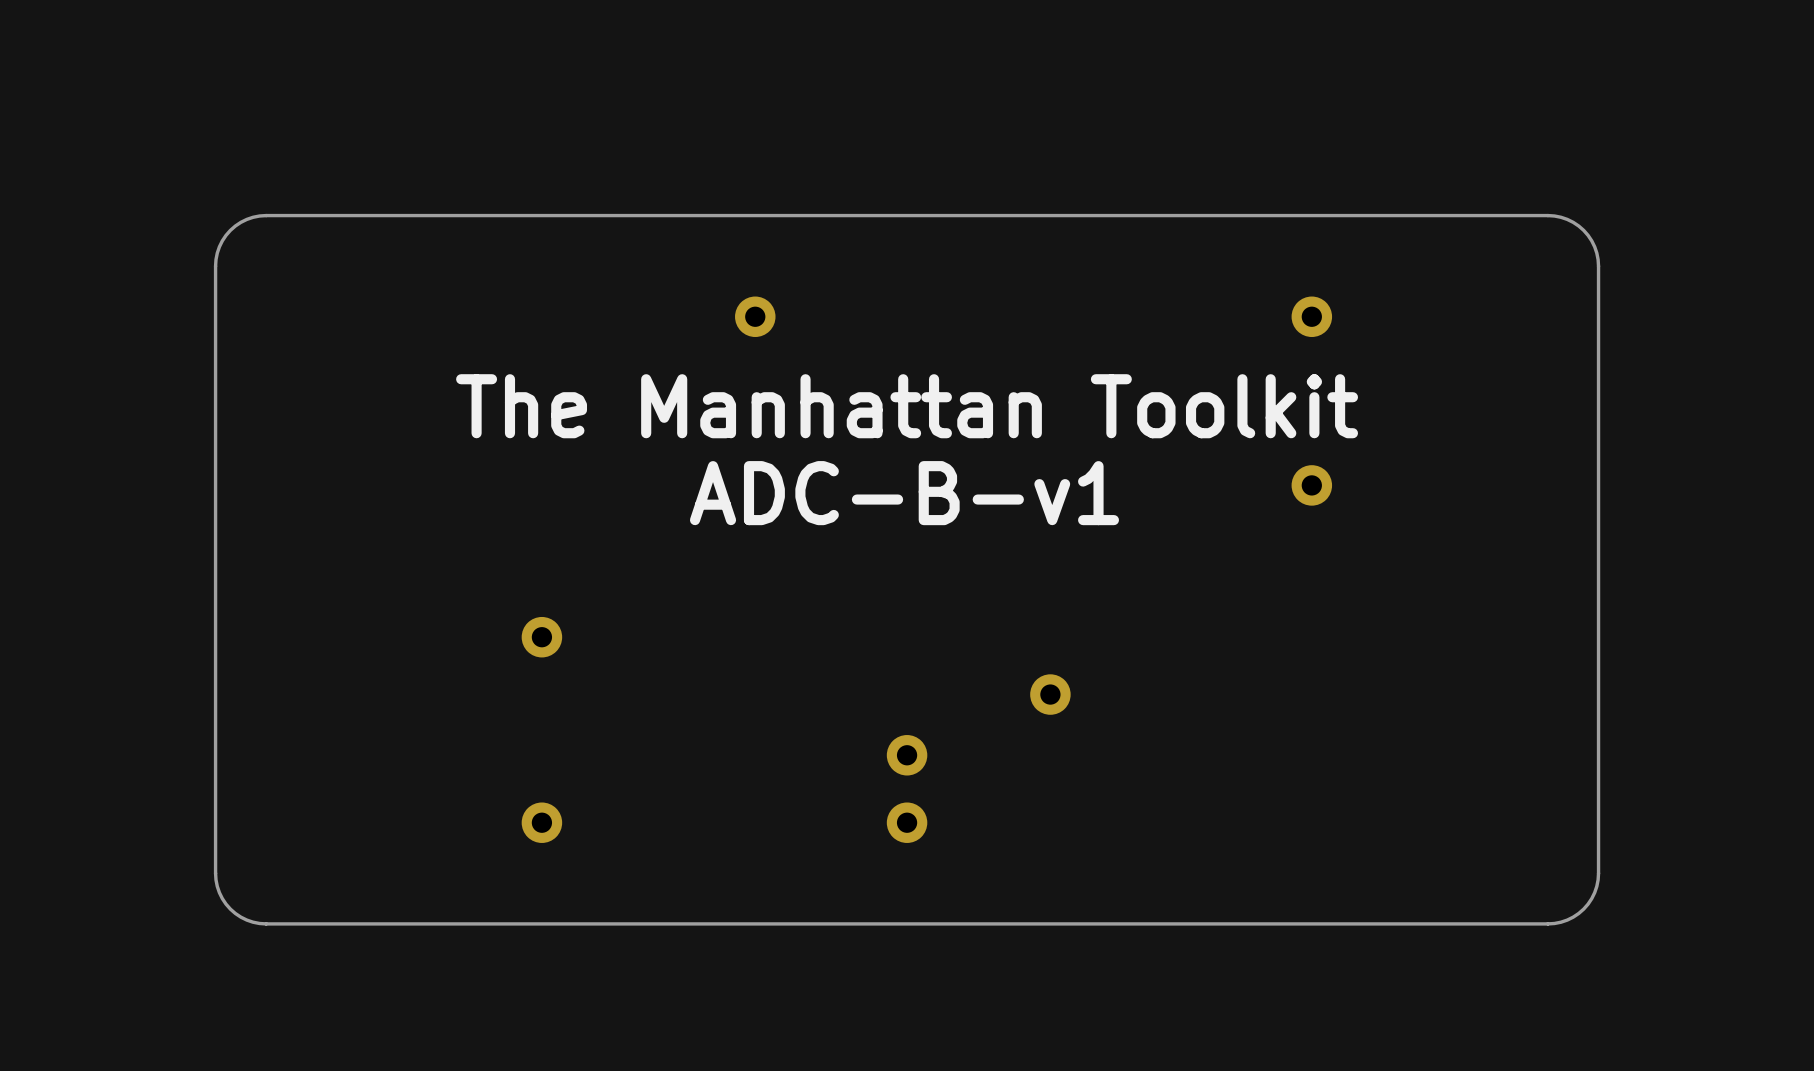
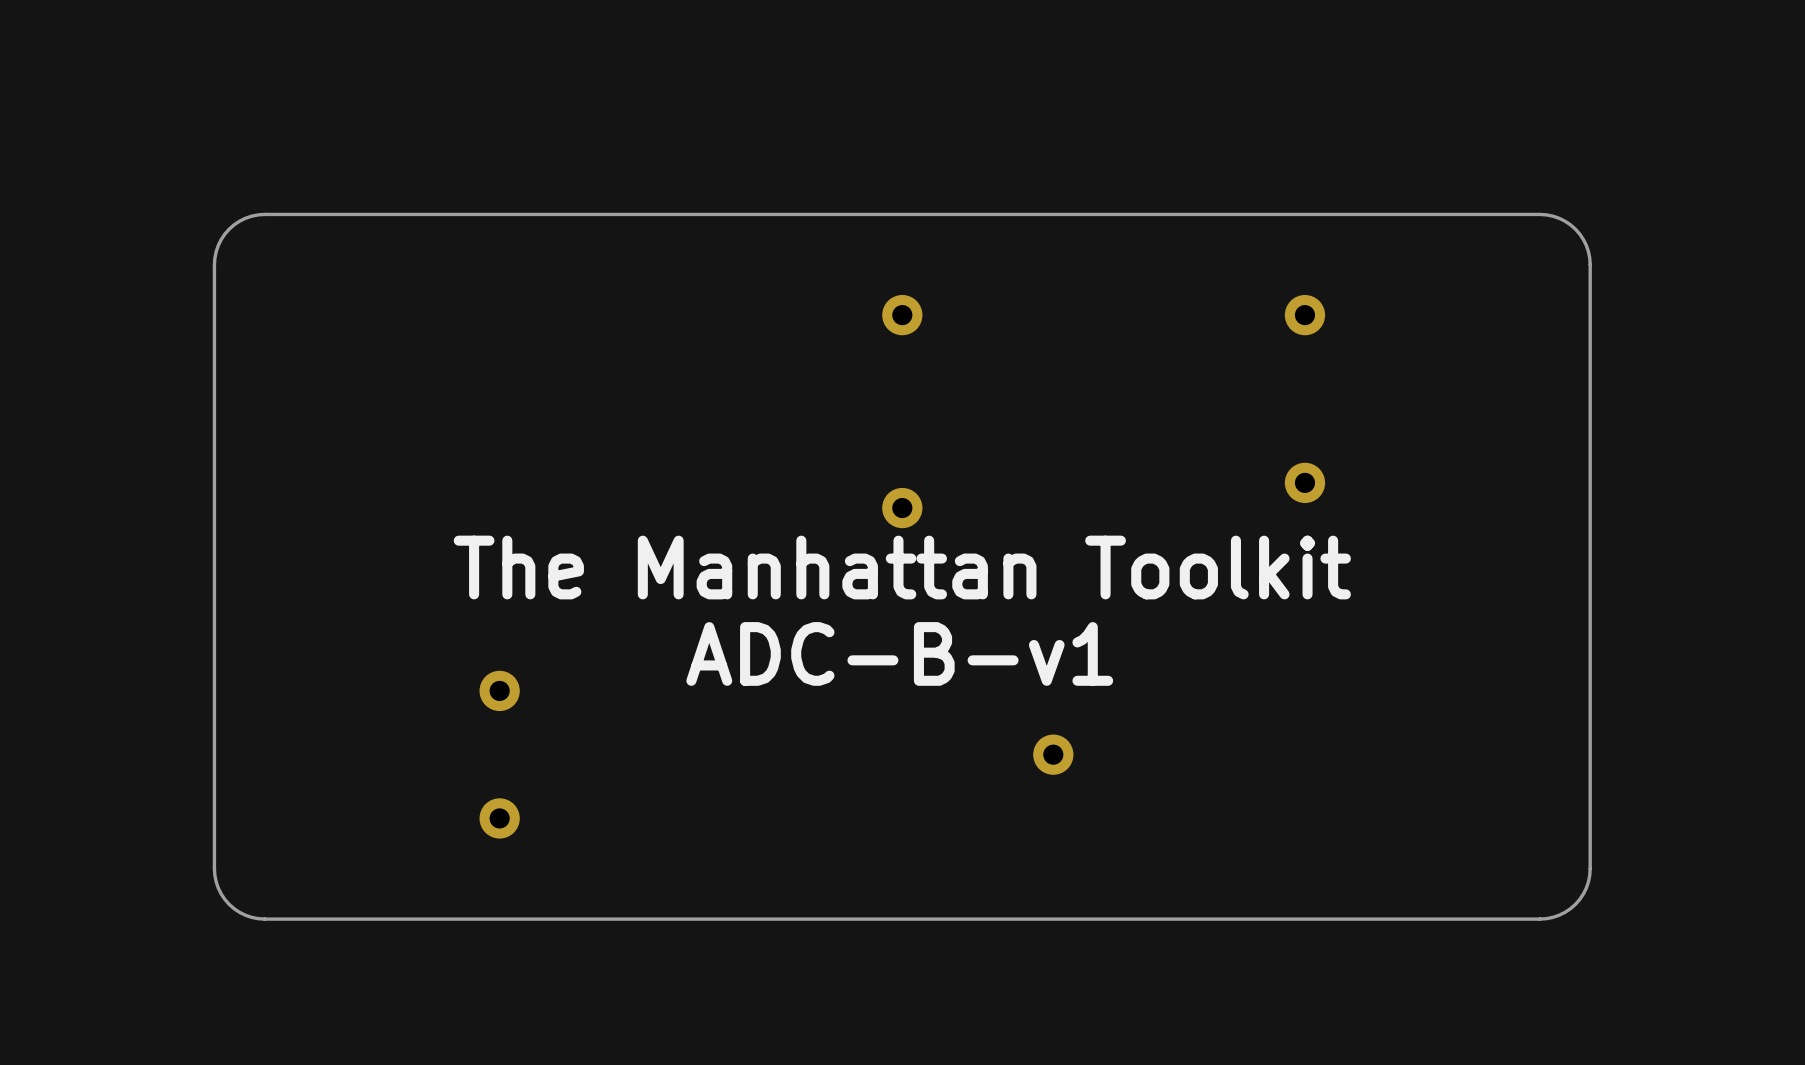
via: (755, 316) -> none
via: none -> (902, 315)
text position: The Manhattan Toolkit (907, 406) -> The Manhattan Toolkit (902, 567)
text position: ADC-B-v1 (904, 493) -> ADC-B-v1 (899, 653)
via: none -> (902, 508)
via: (541, 637) -> none
via: none -> (499, 690)
via position: (1050, 694) -> (1053, 754)
via: (907, 755) -> none
via position: (541, 822) -> (499, 818)
via: (907, 822) -> none

